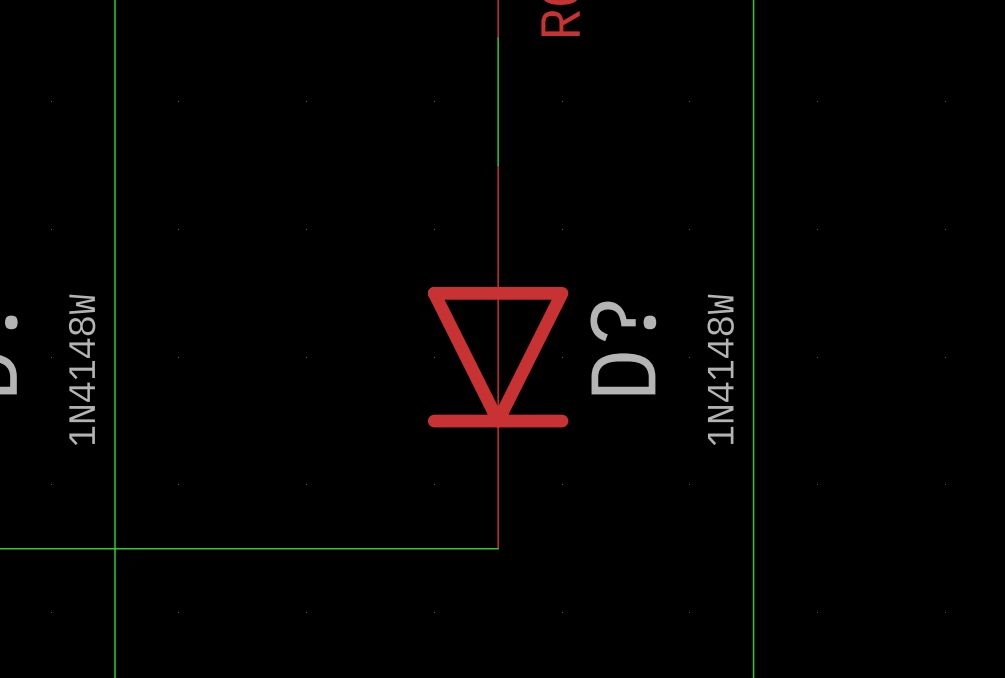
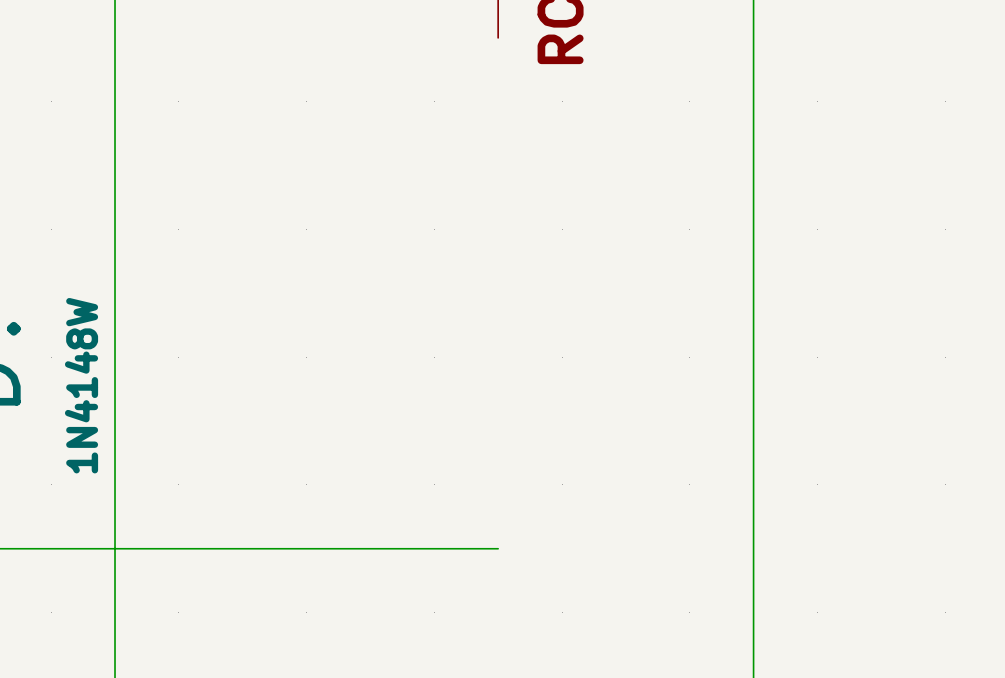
wire: (498, 37) (498, 165) -> none
D?: 1N4148W (498, 357) -> none

